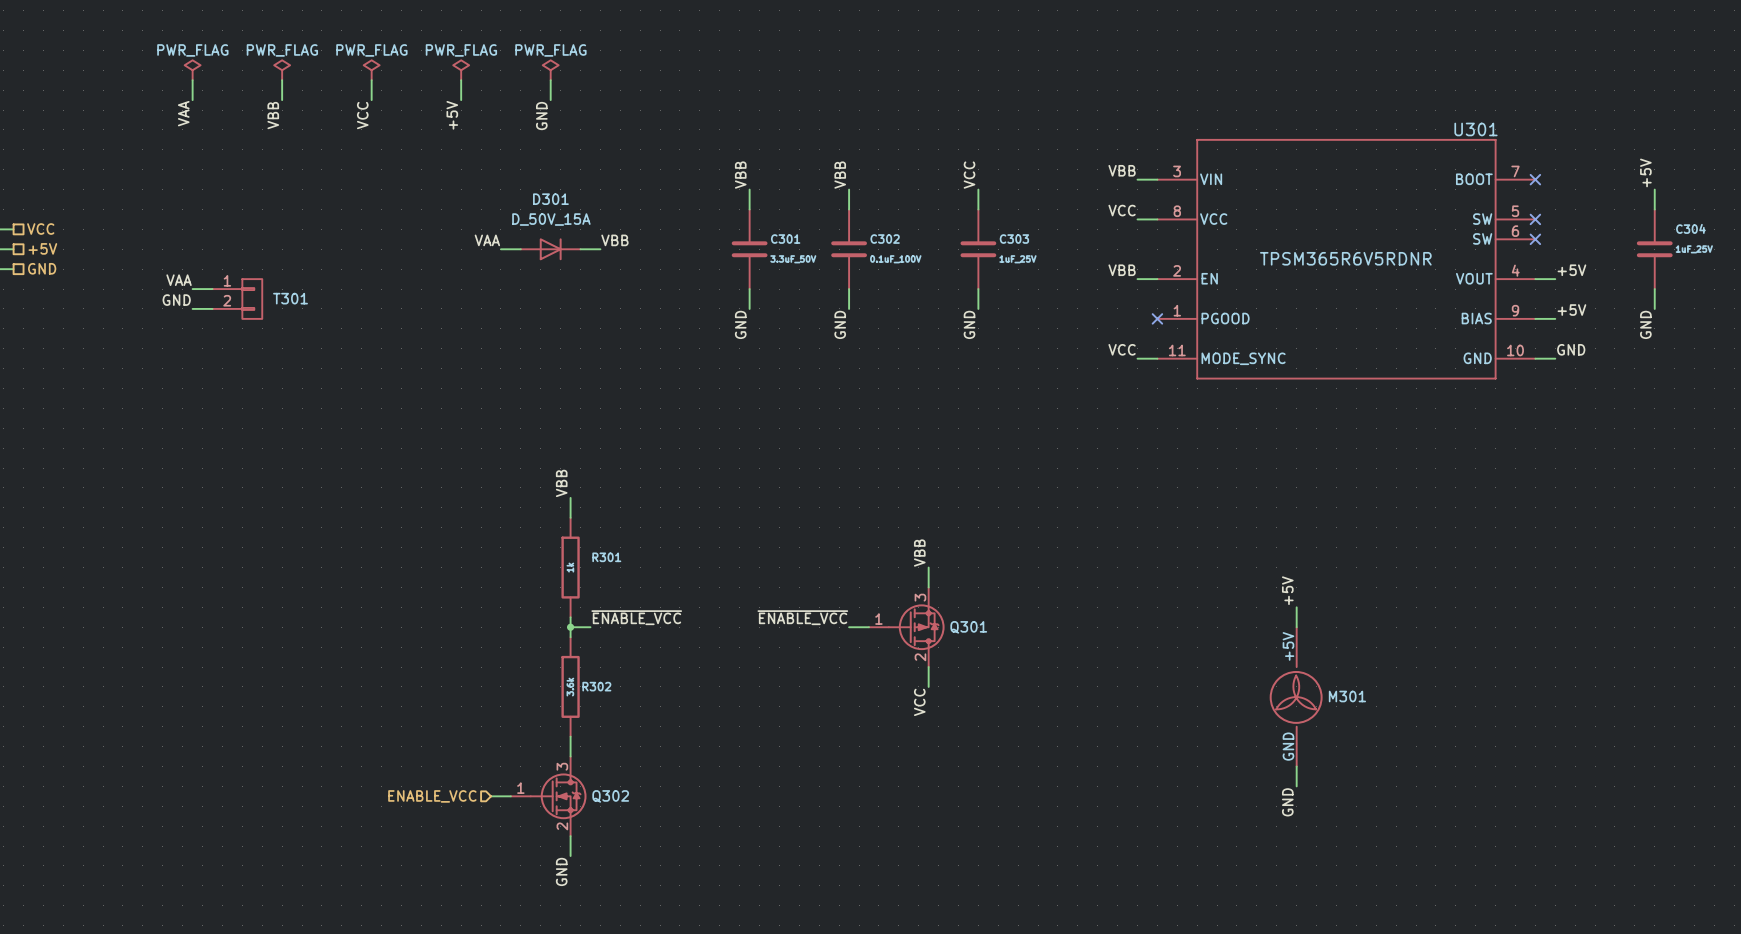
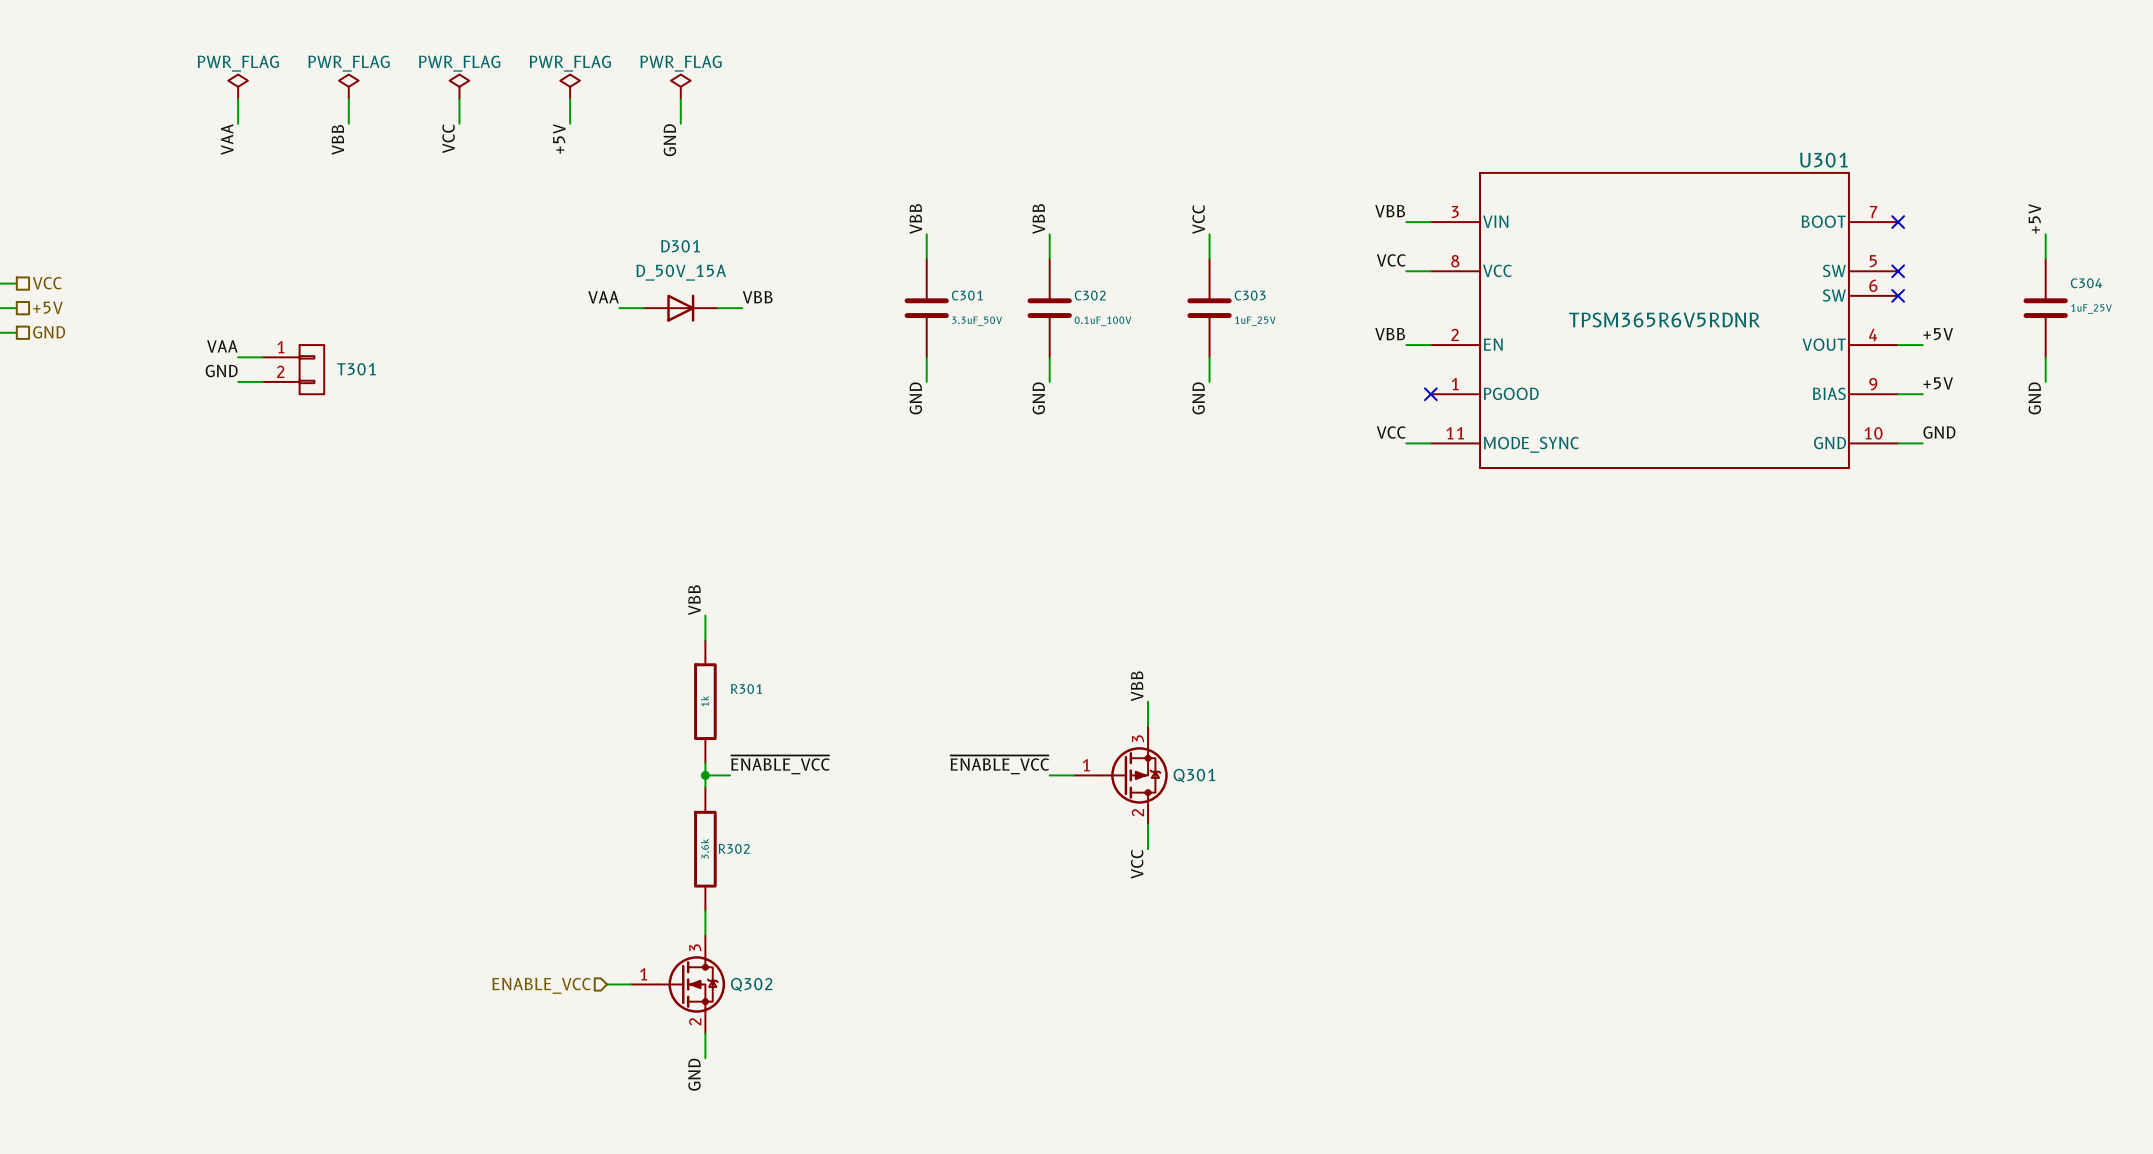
label: +5V (1287, 590) -> none
wire: (1296, 607) (1296, 627) -> none
M301: (1296, 696) -> none
wire: (1296, 766) (1296, 786) -> none
label: GND (1287, 802) -> none

